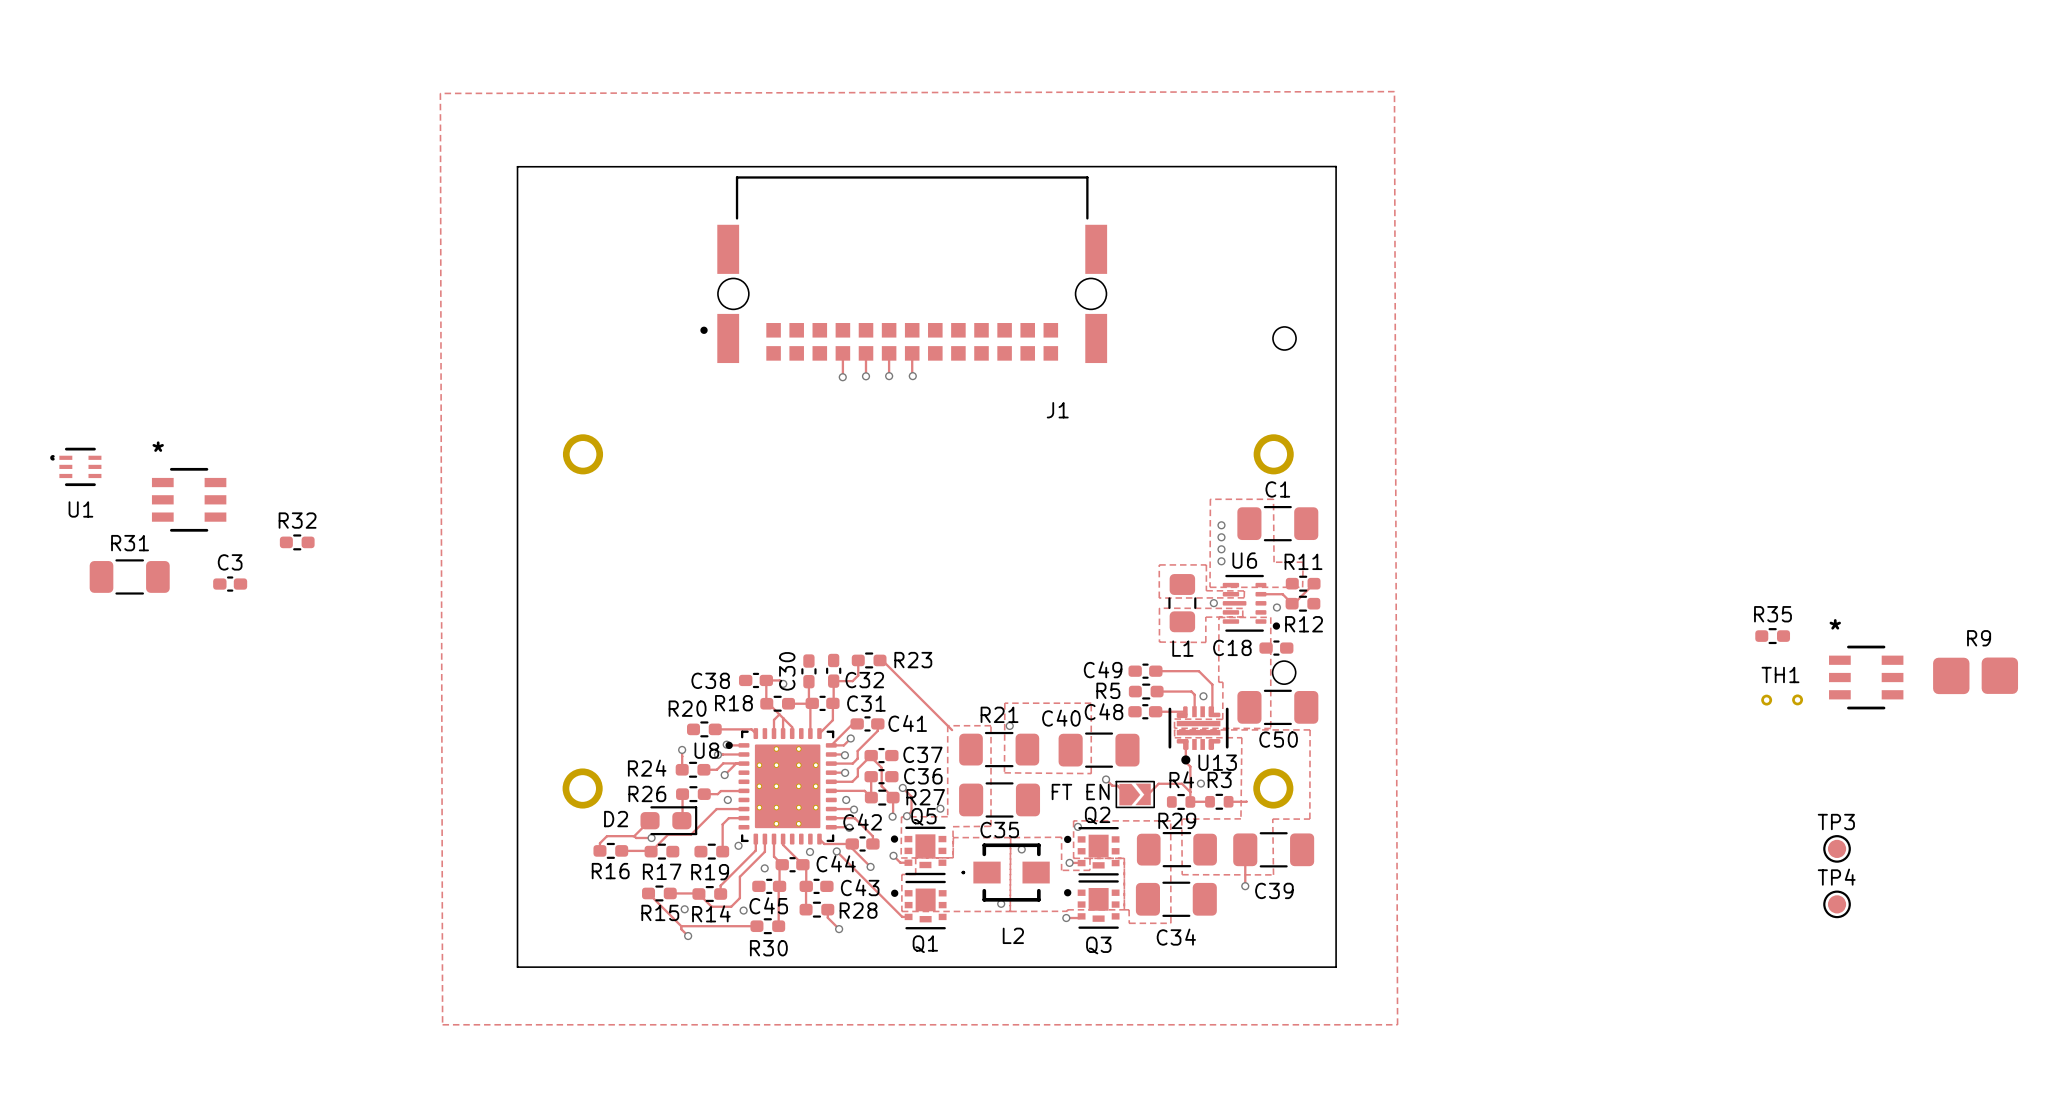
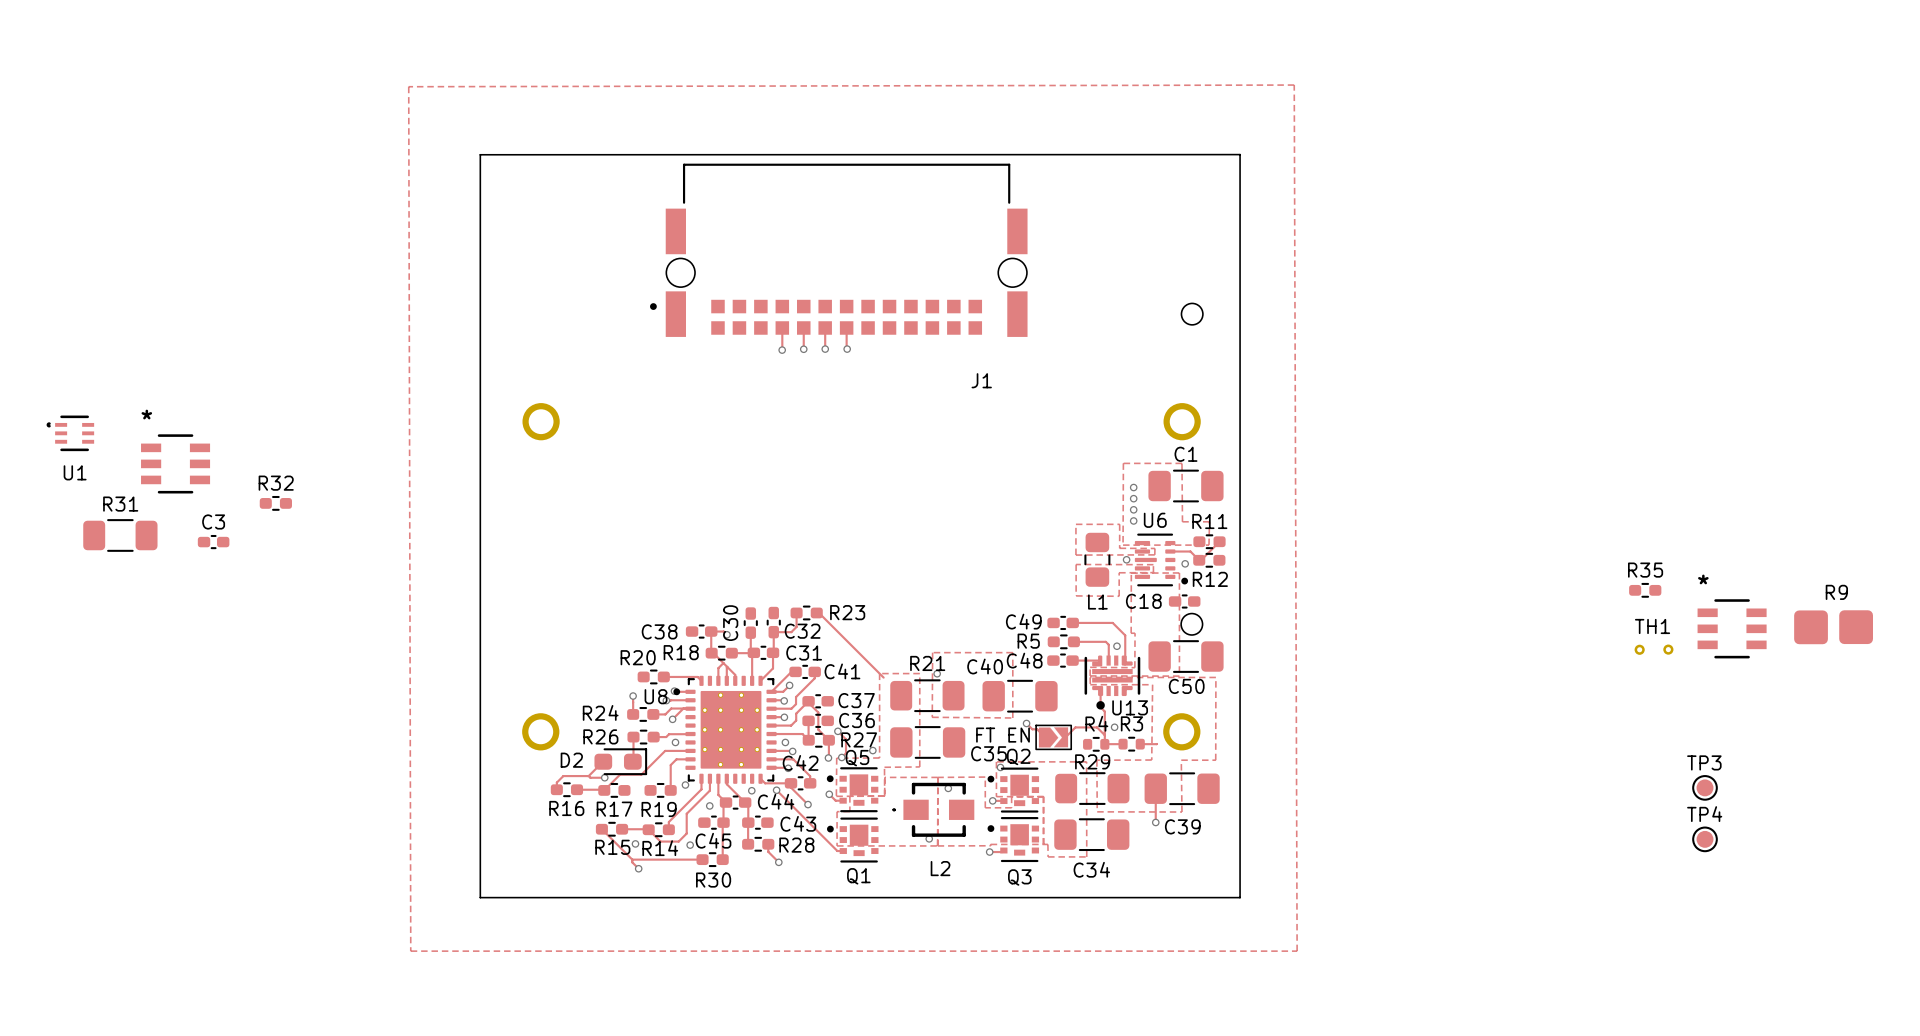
C35 name position: C35 (999, 829) -> C35 (989, 753)

